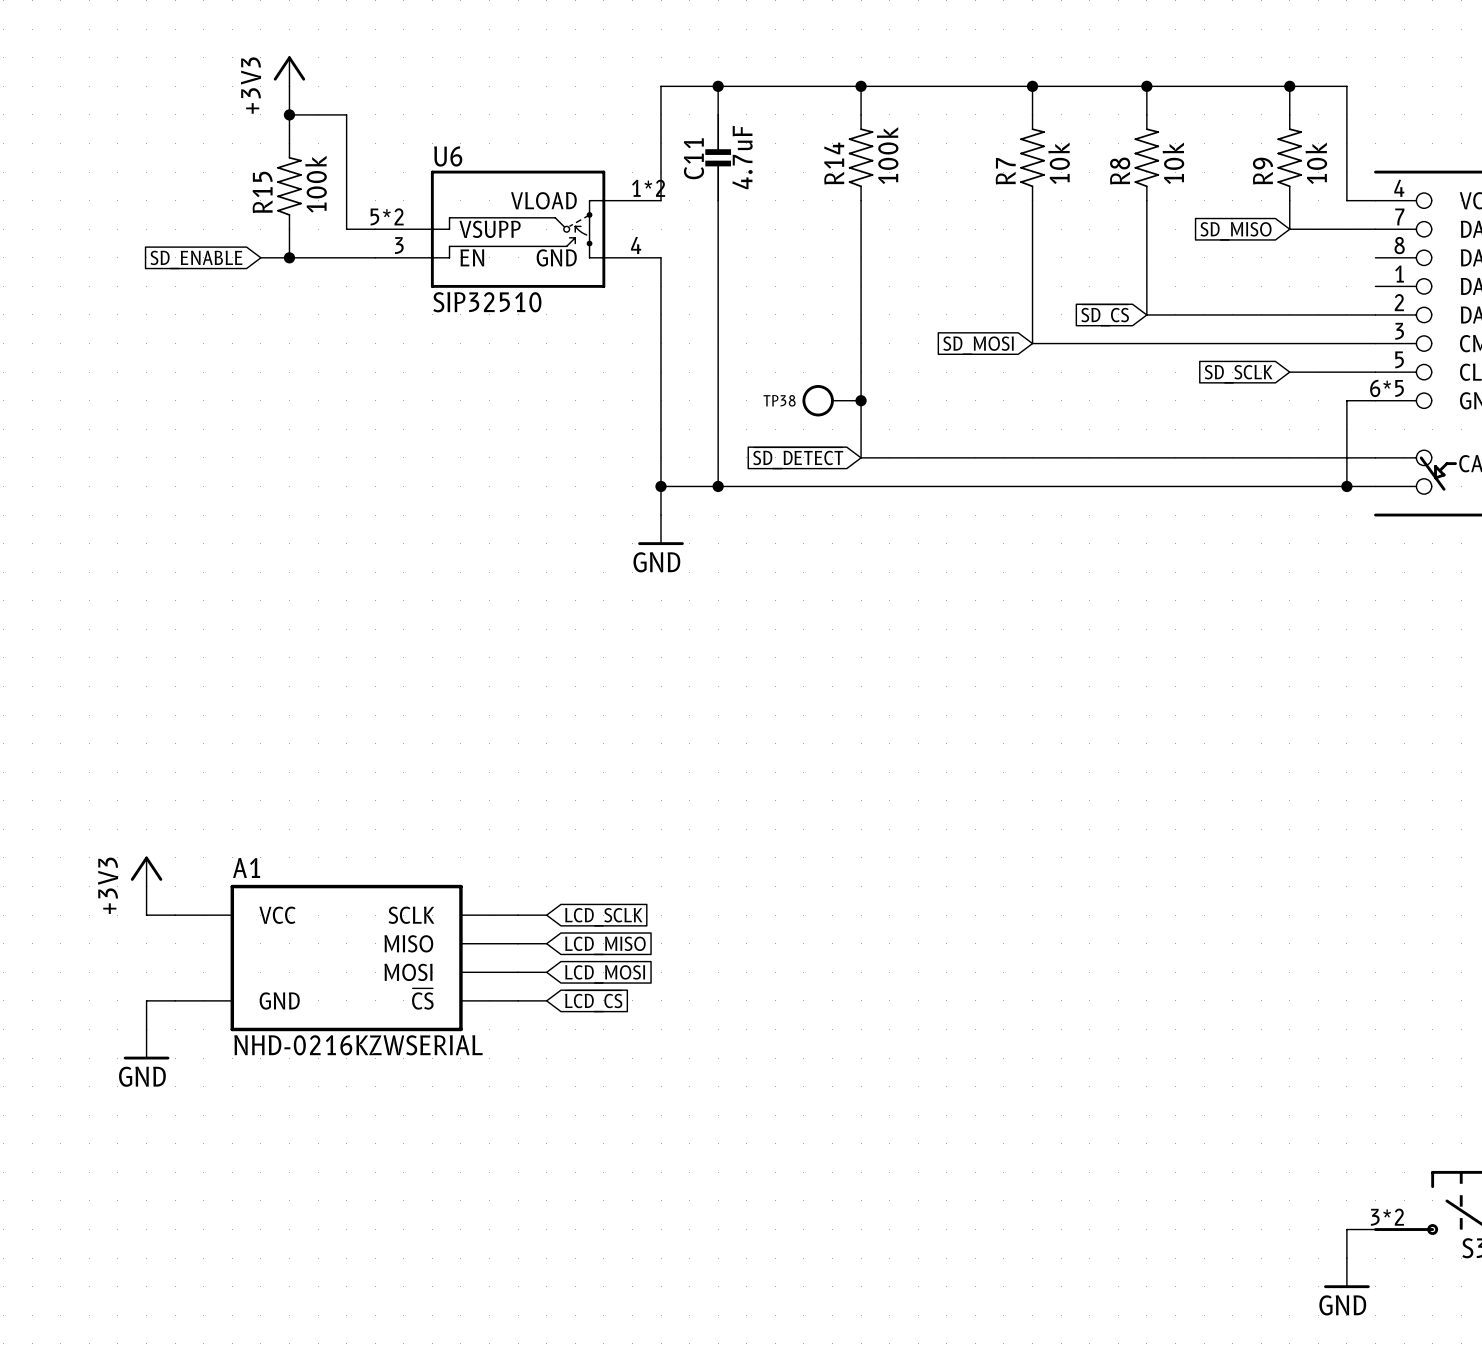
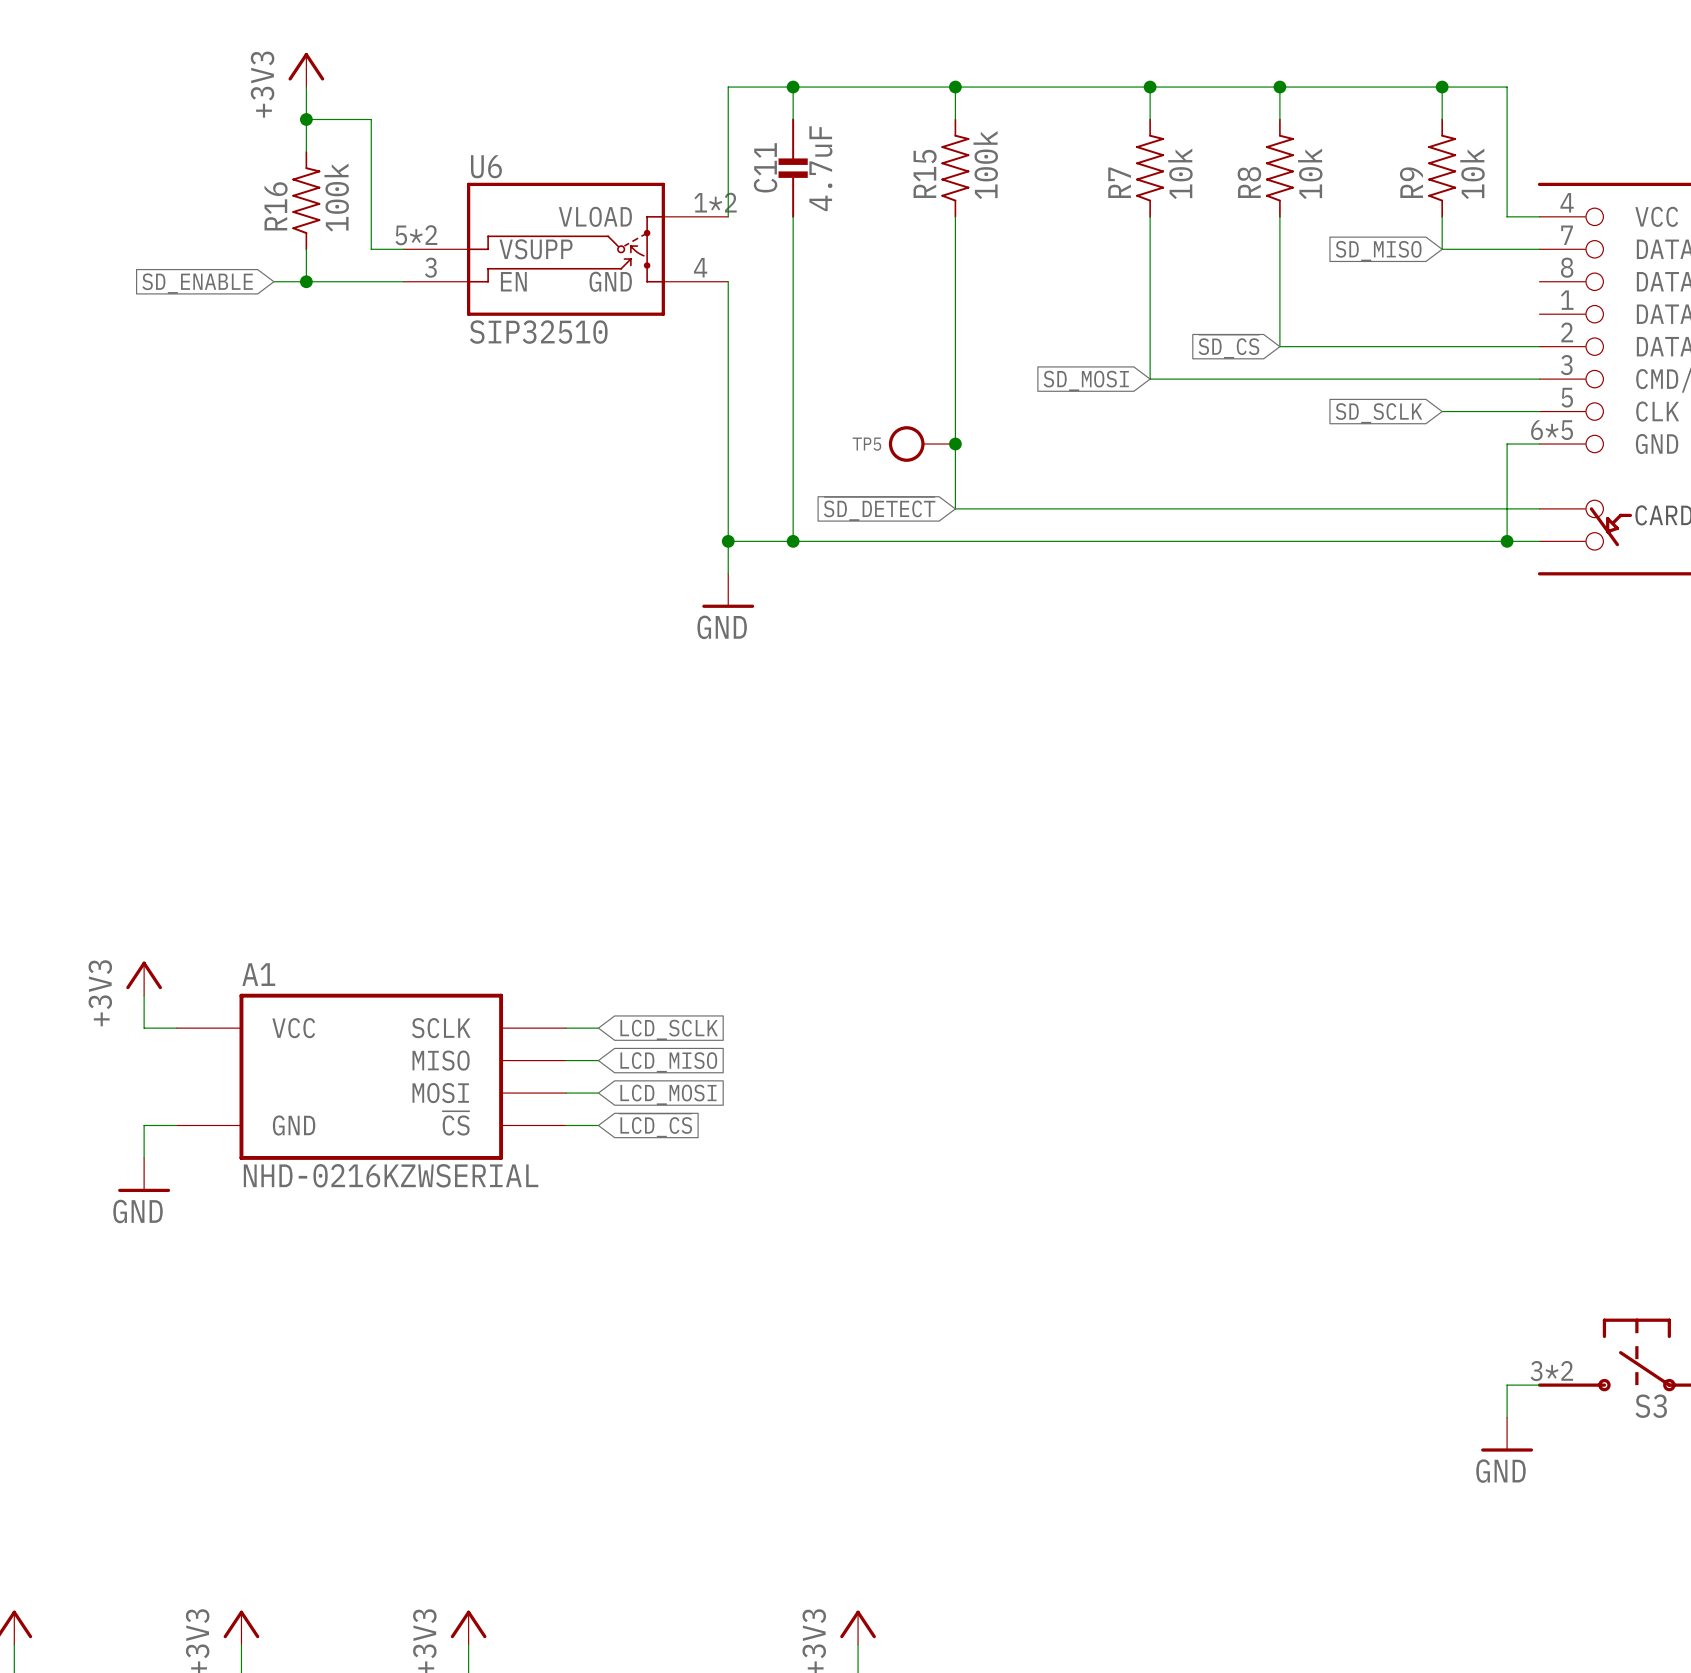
R14 name: R14 (834, 163) -> R15 (925, 173)
R15 name: R15 (262, 192) -> R16 (276, 206)
TP38 name: TP38 (779, 400) -> TP5 (866, 444)

